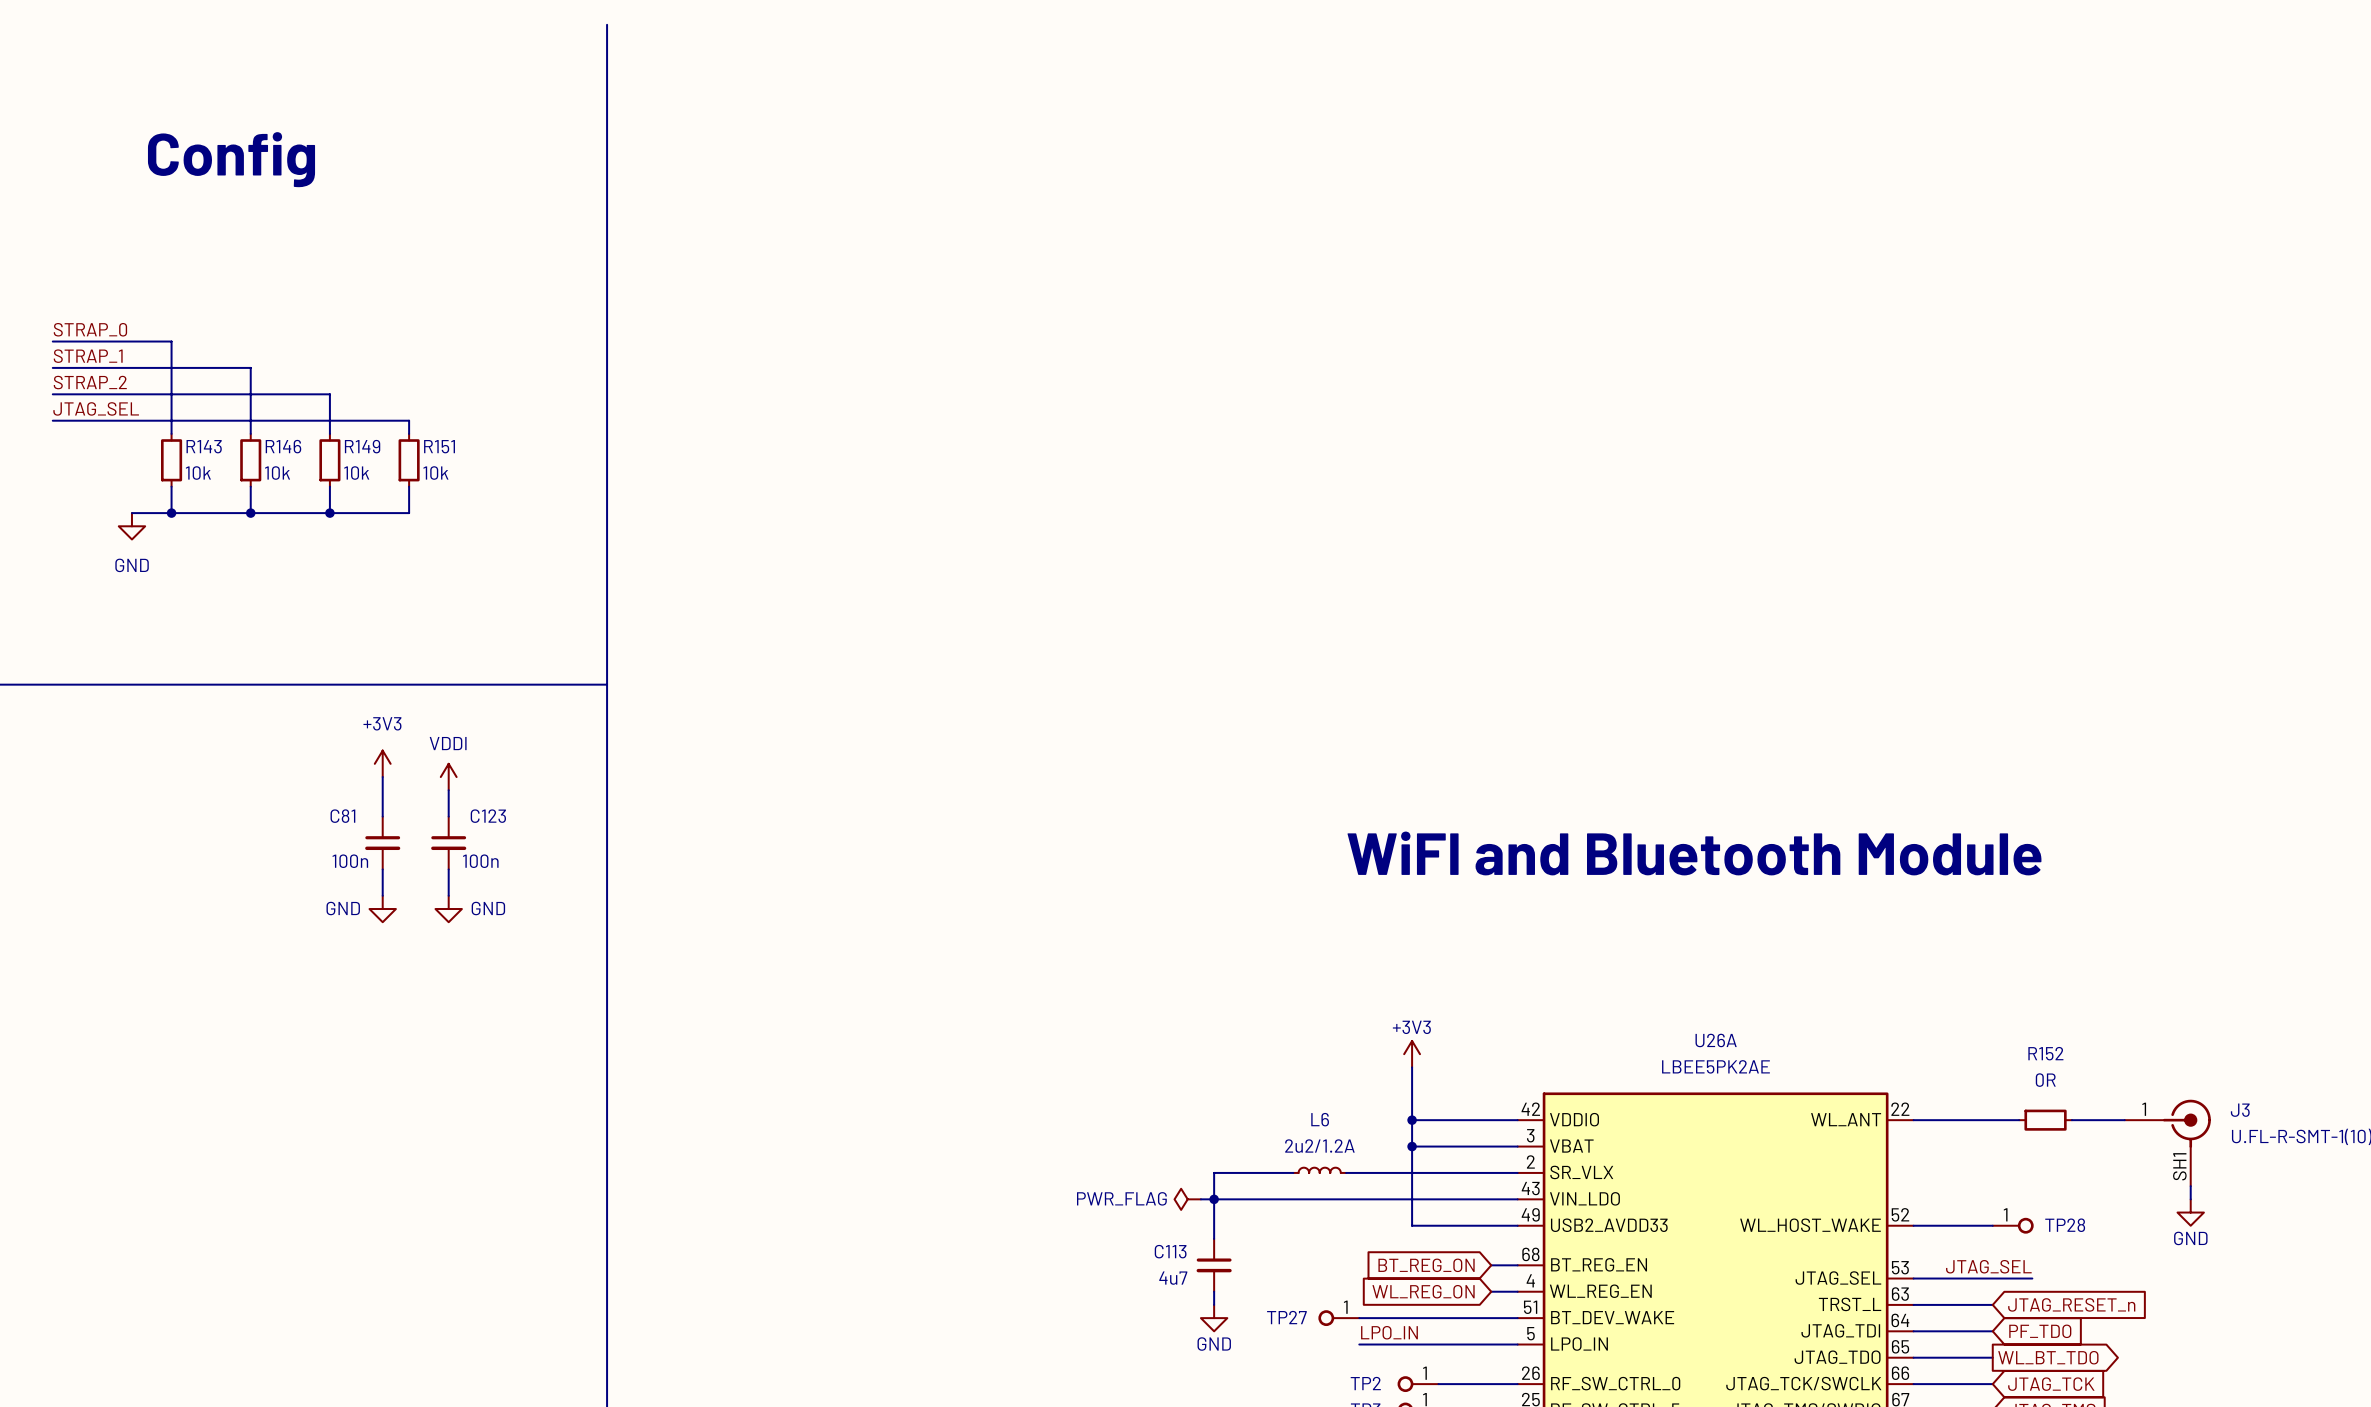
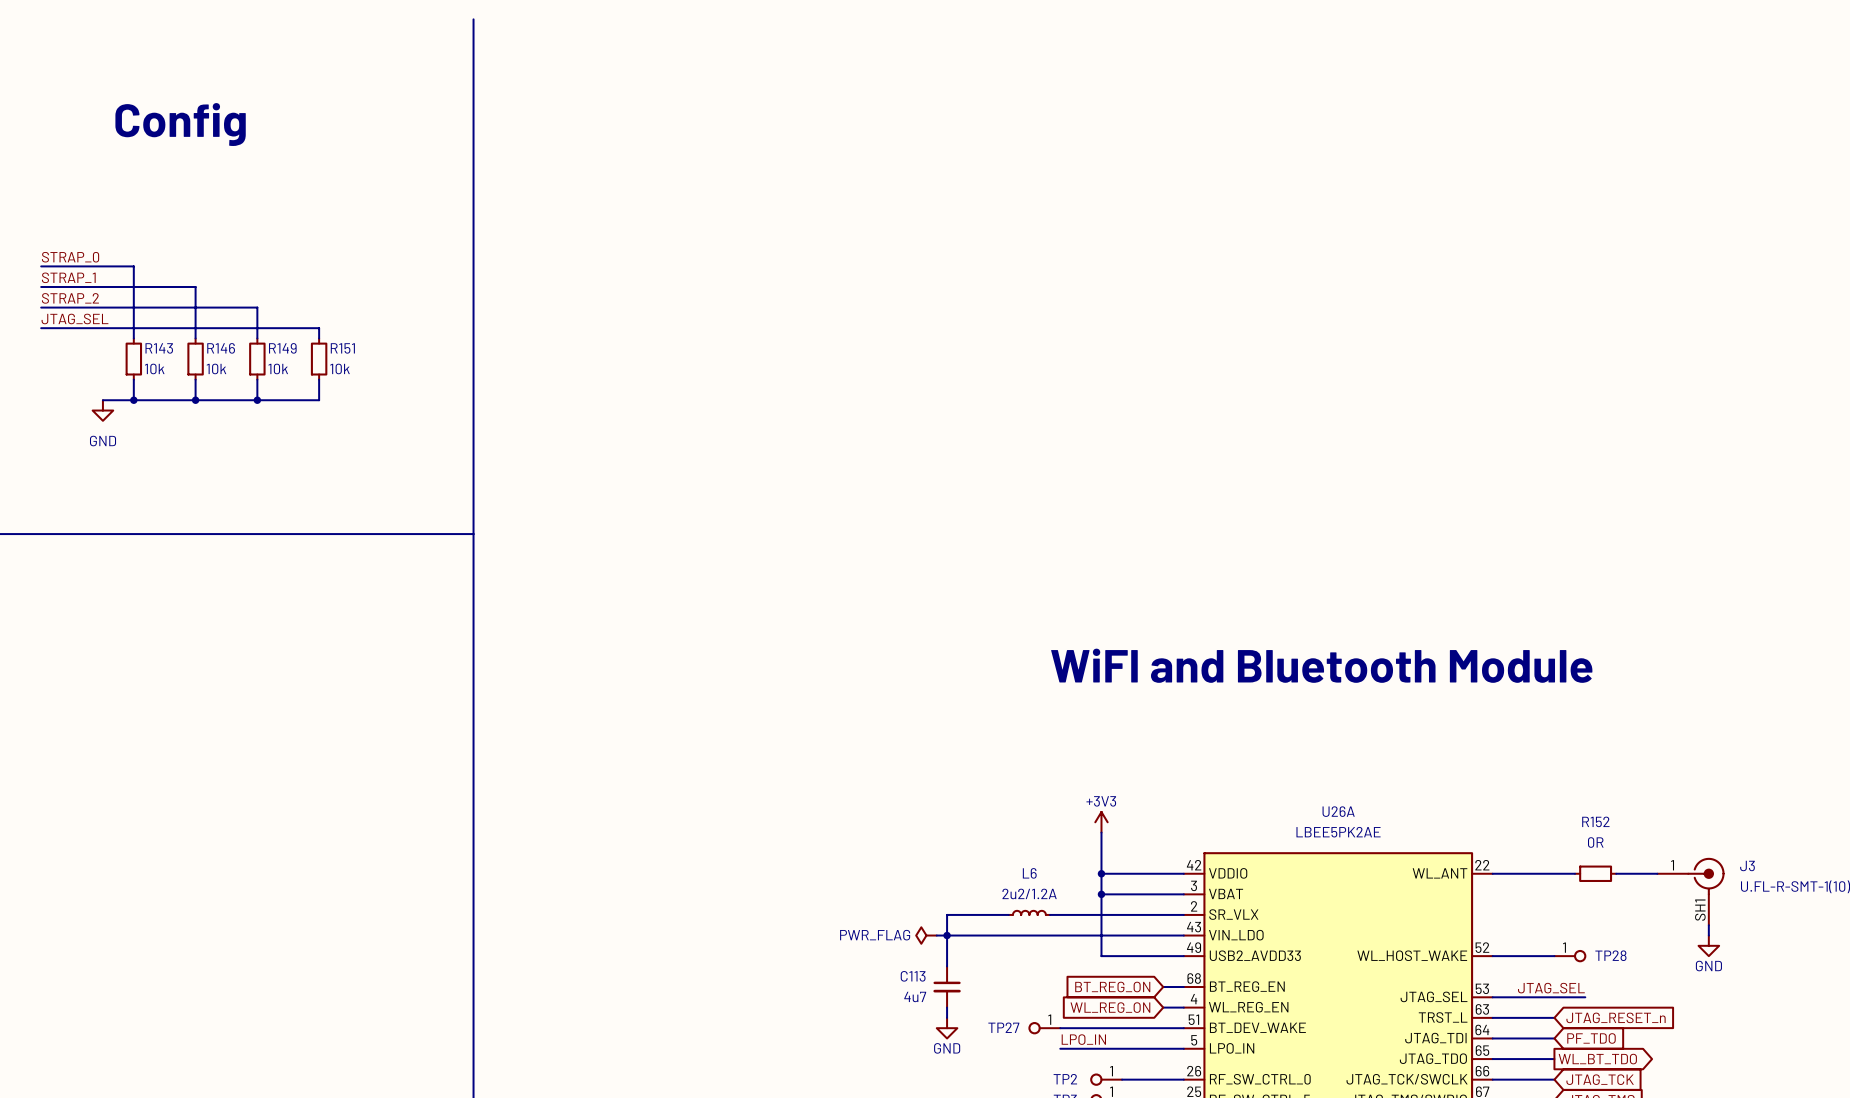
power symbol: +3V3 (382, 763) -> none
wire: (382, 777) (382, 816) -> none
power symbol: VDDI (448, 777) -> none
wire: (448, 790) (448, 816) -> none
C81: (382, 843) -> none
C123: (448, 843) -> none
wire: (382, 869) (382, 895) -> none
wire: (448, 869) (448, 895) -> none
power symbol: GND (382, 909) -> none
power symbol: GND (448, 909) -> none

